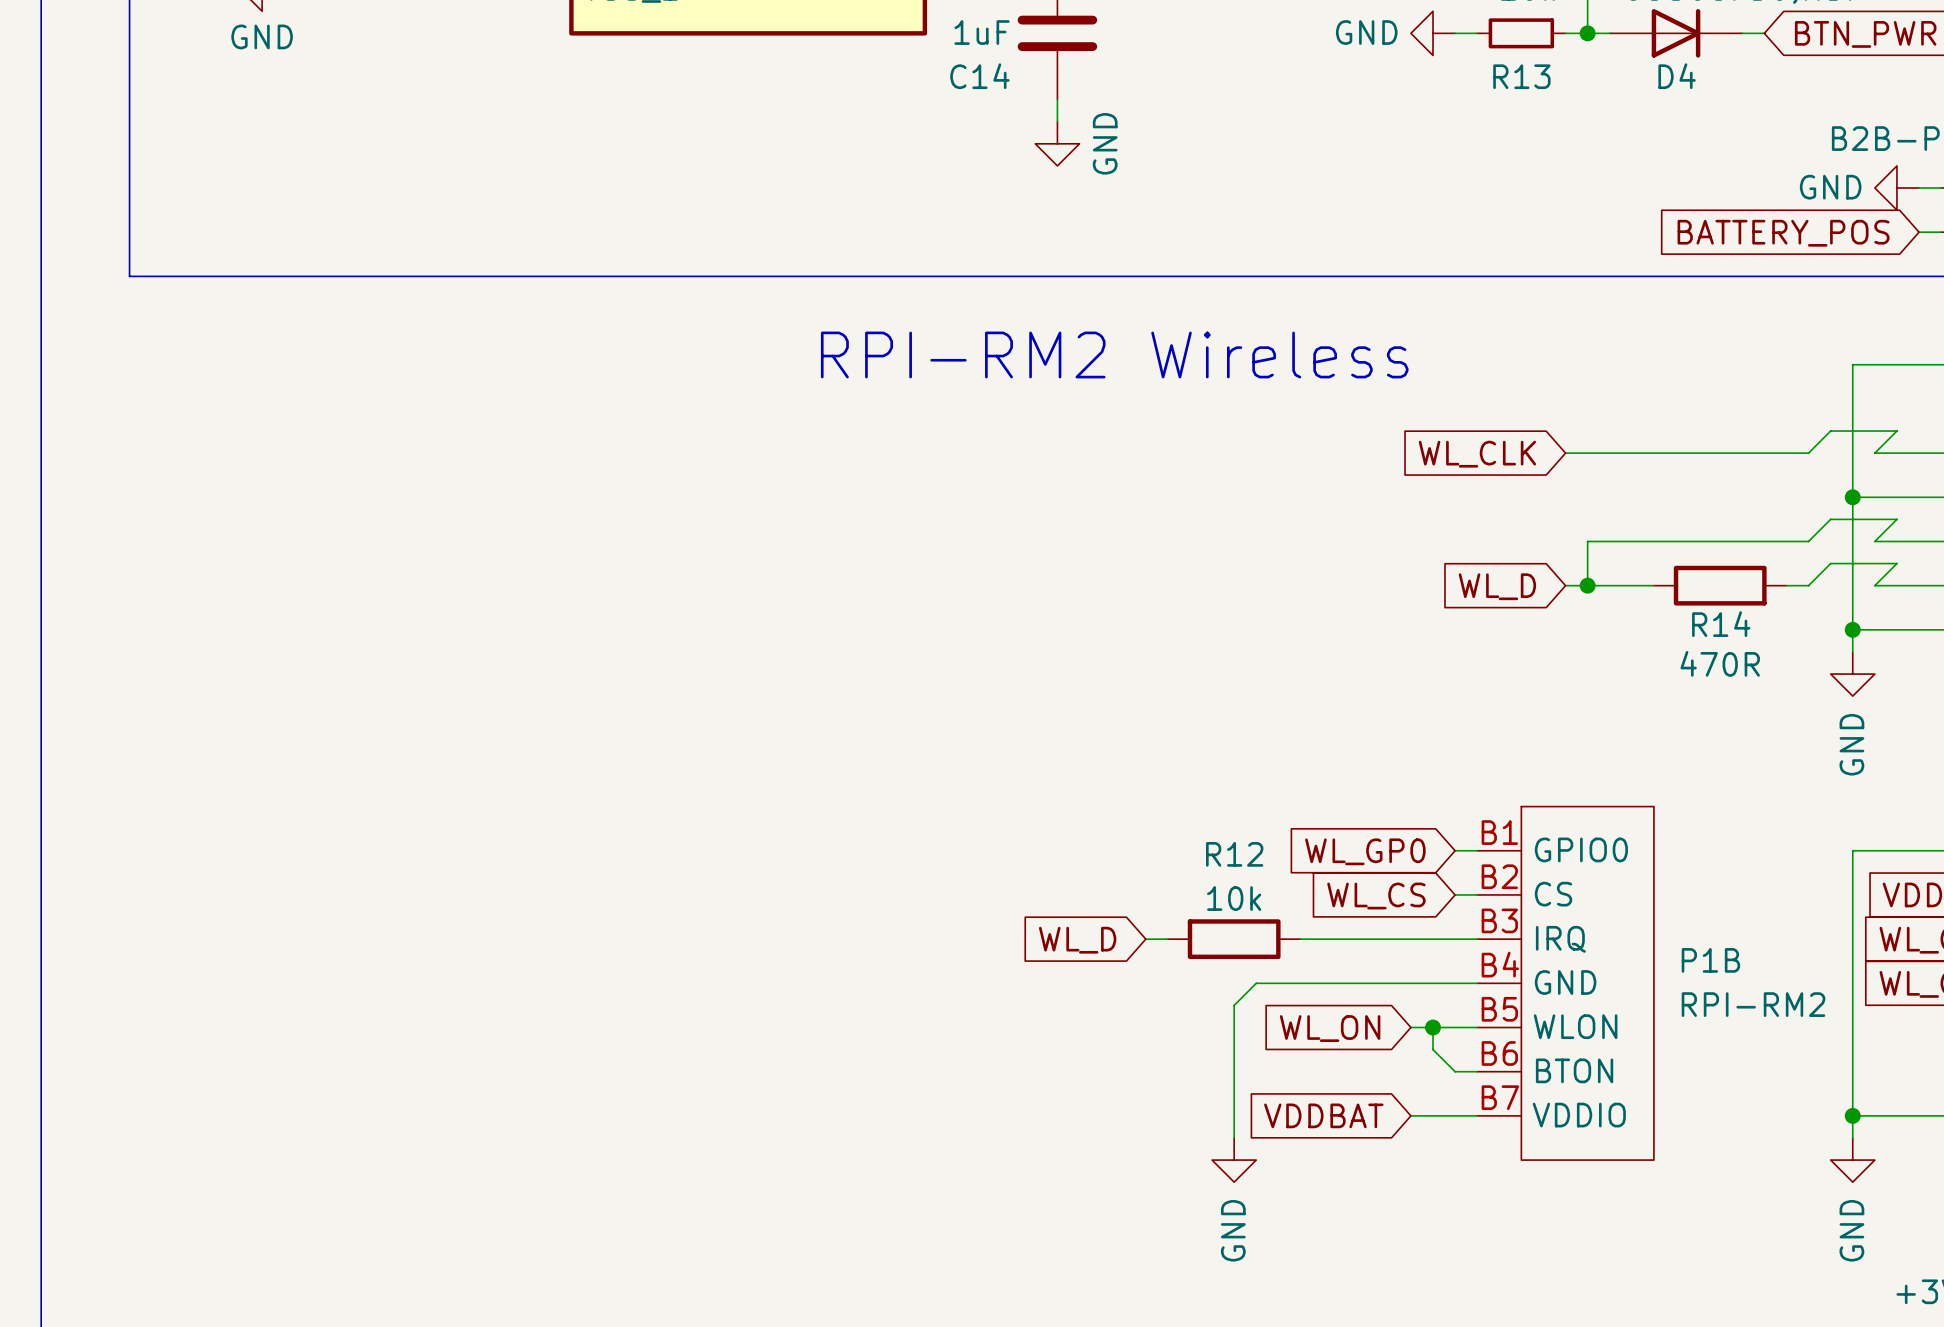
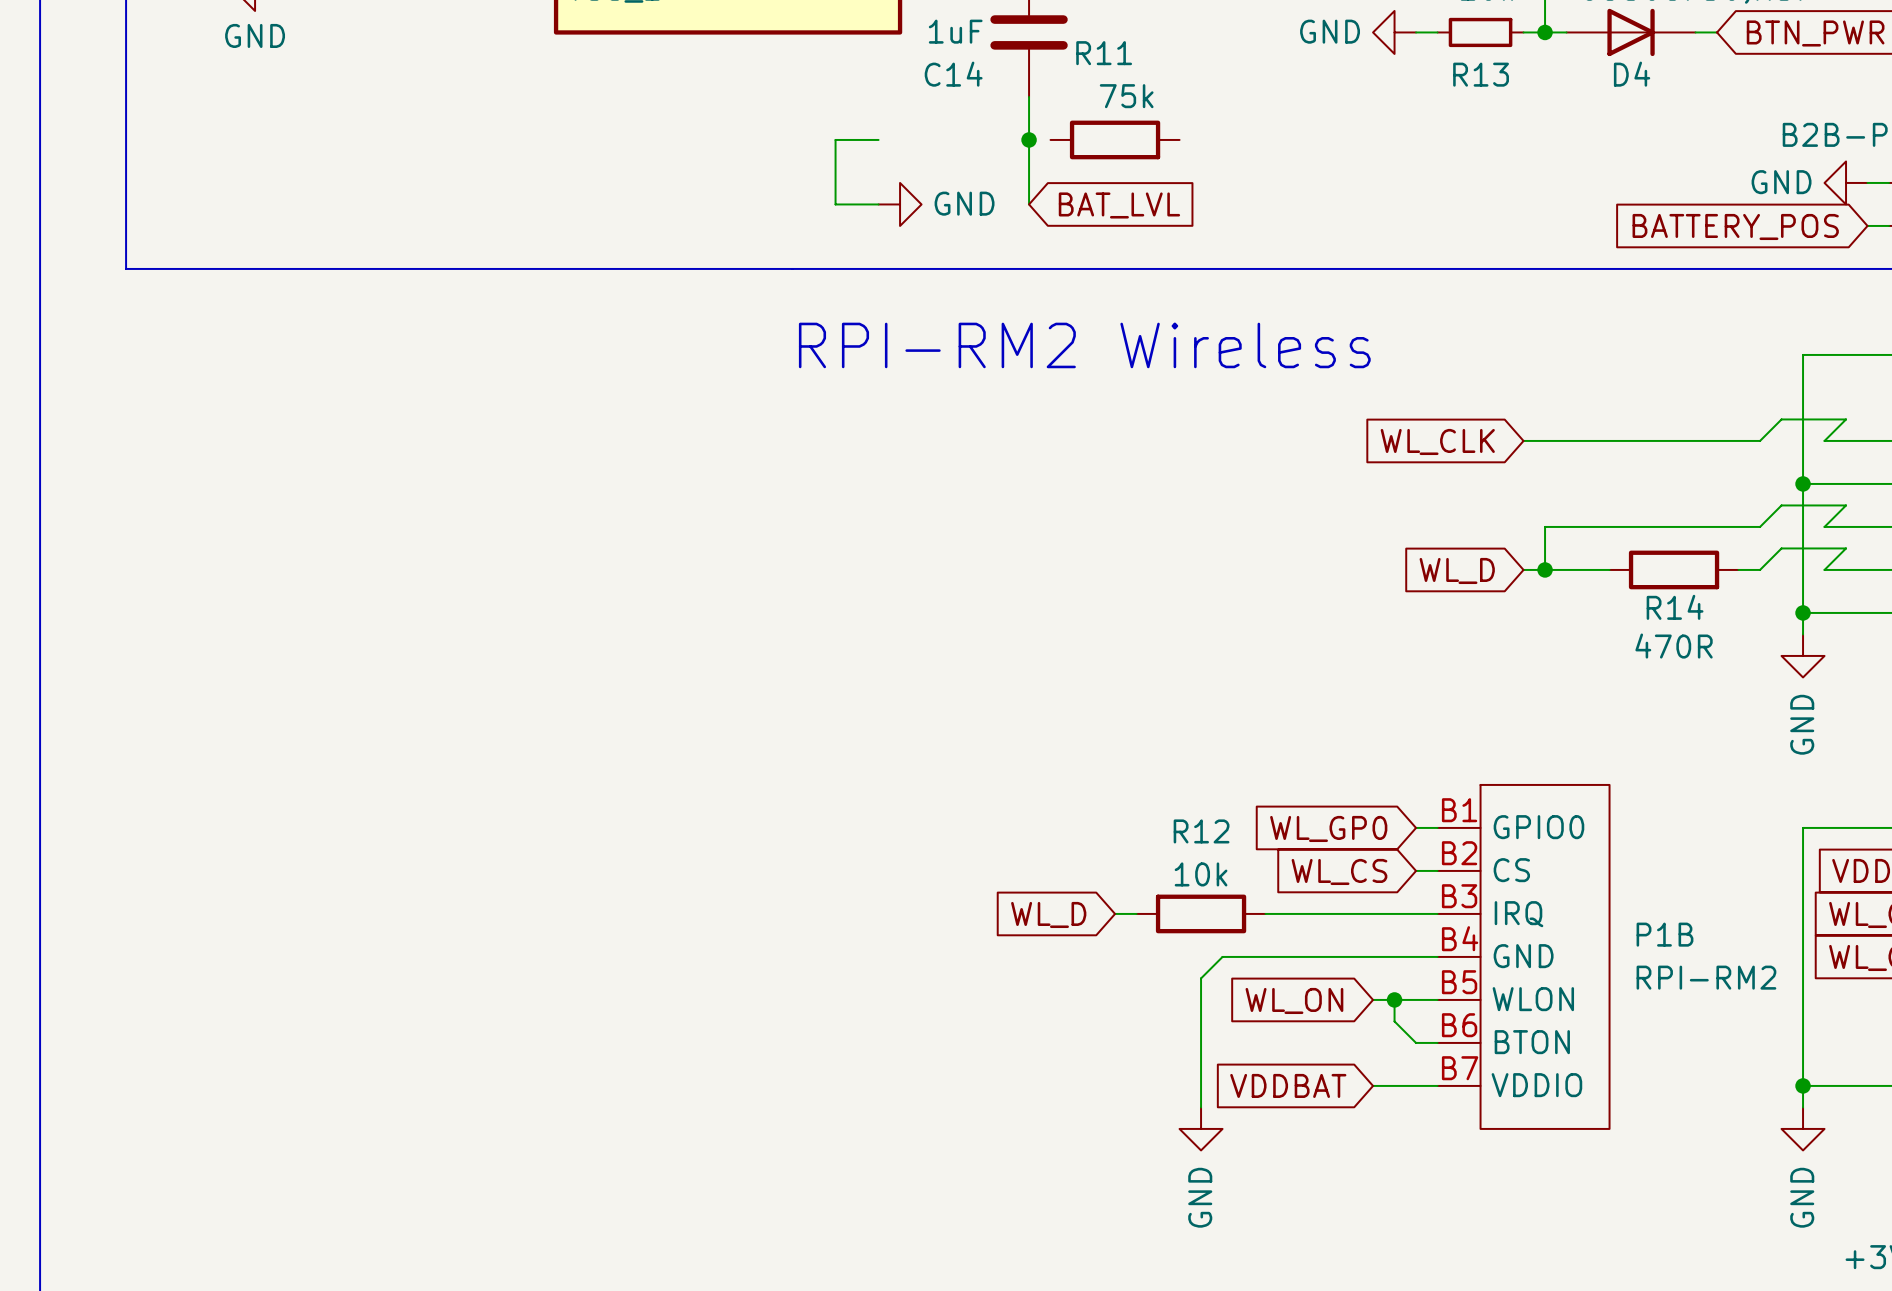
wire: none -> (1029, 118) (1029, 204)
wire: none -> (878, 139) (835, 139) (835, 204) (878, 204)
junction: none -> (1029, 139)
power symbol: GND (1057, 143) -> none
R11: none -> 75k (1115, 139)
power symbol: none -> GND (900, 204)
global label: none -> BAT_LVL (1119, 205)

